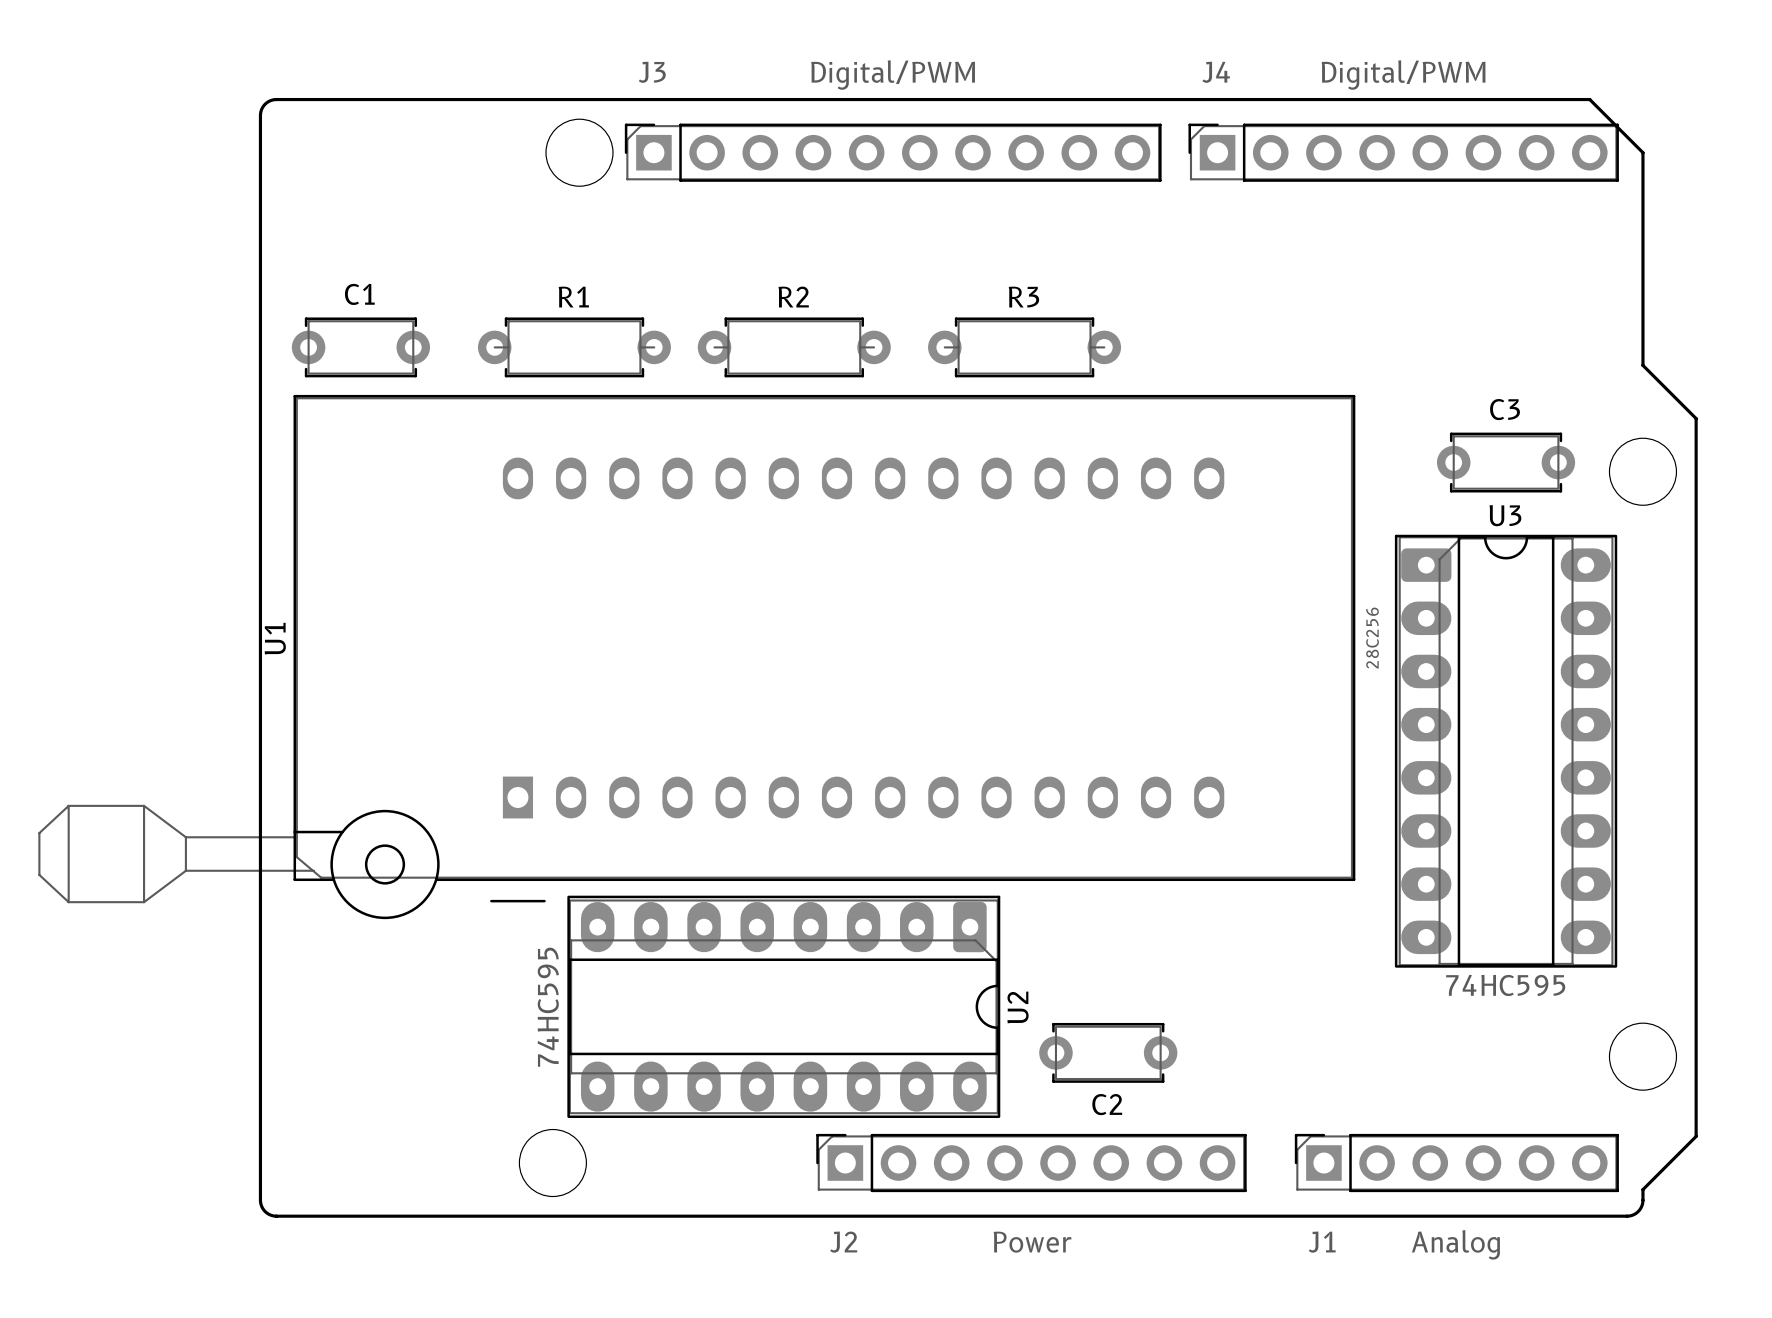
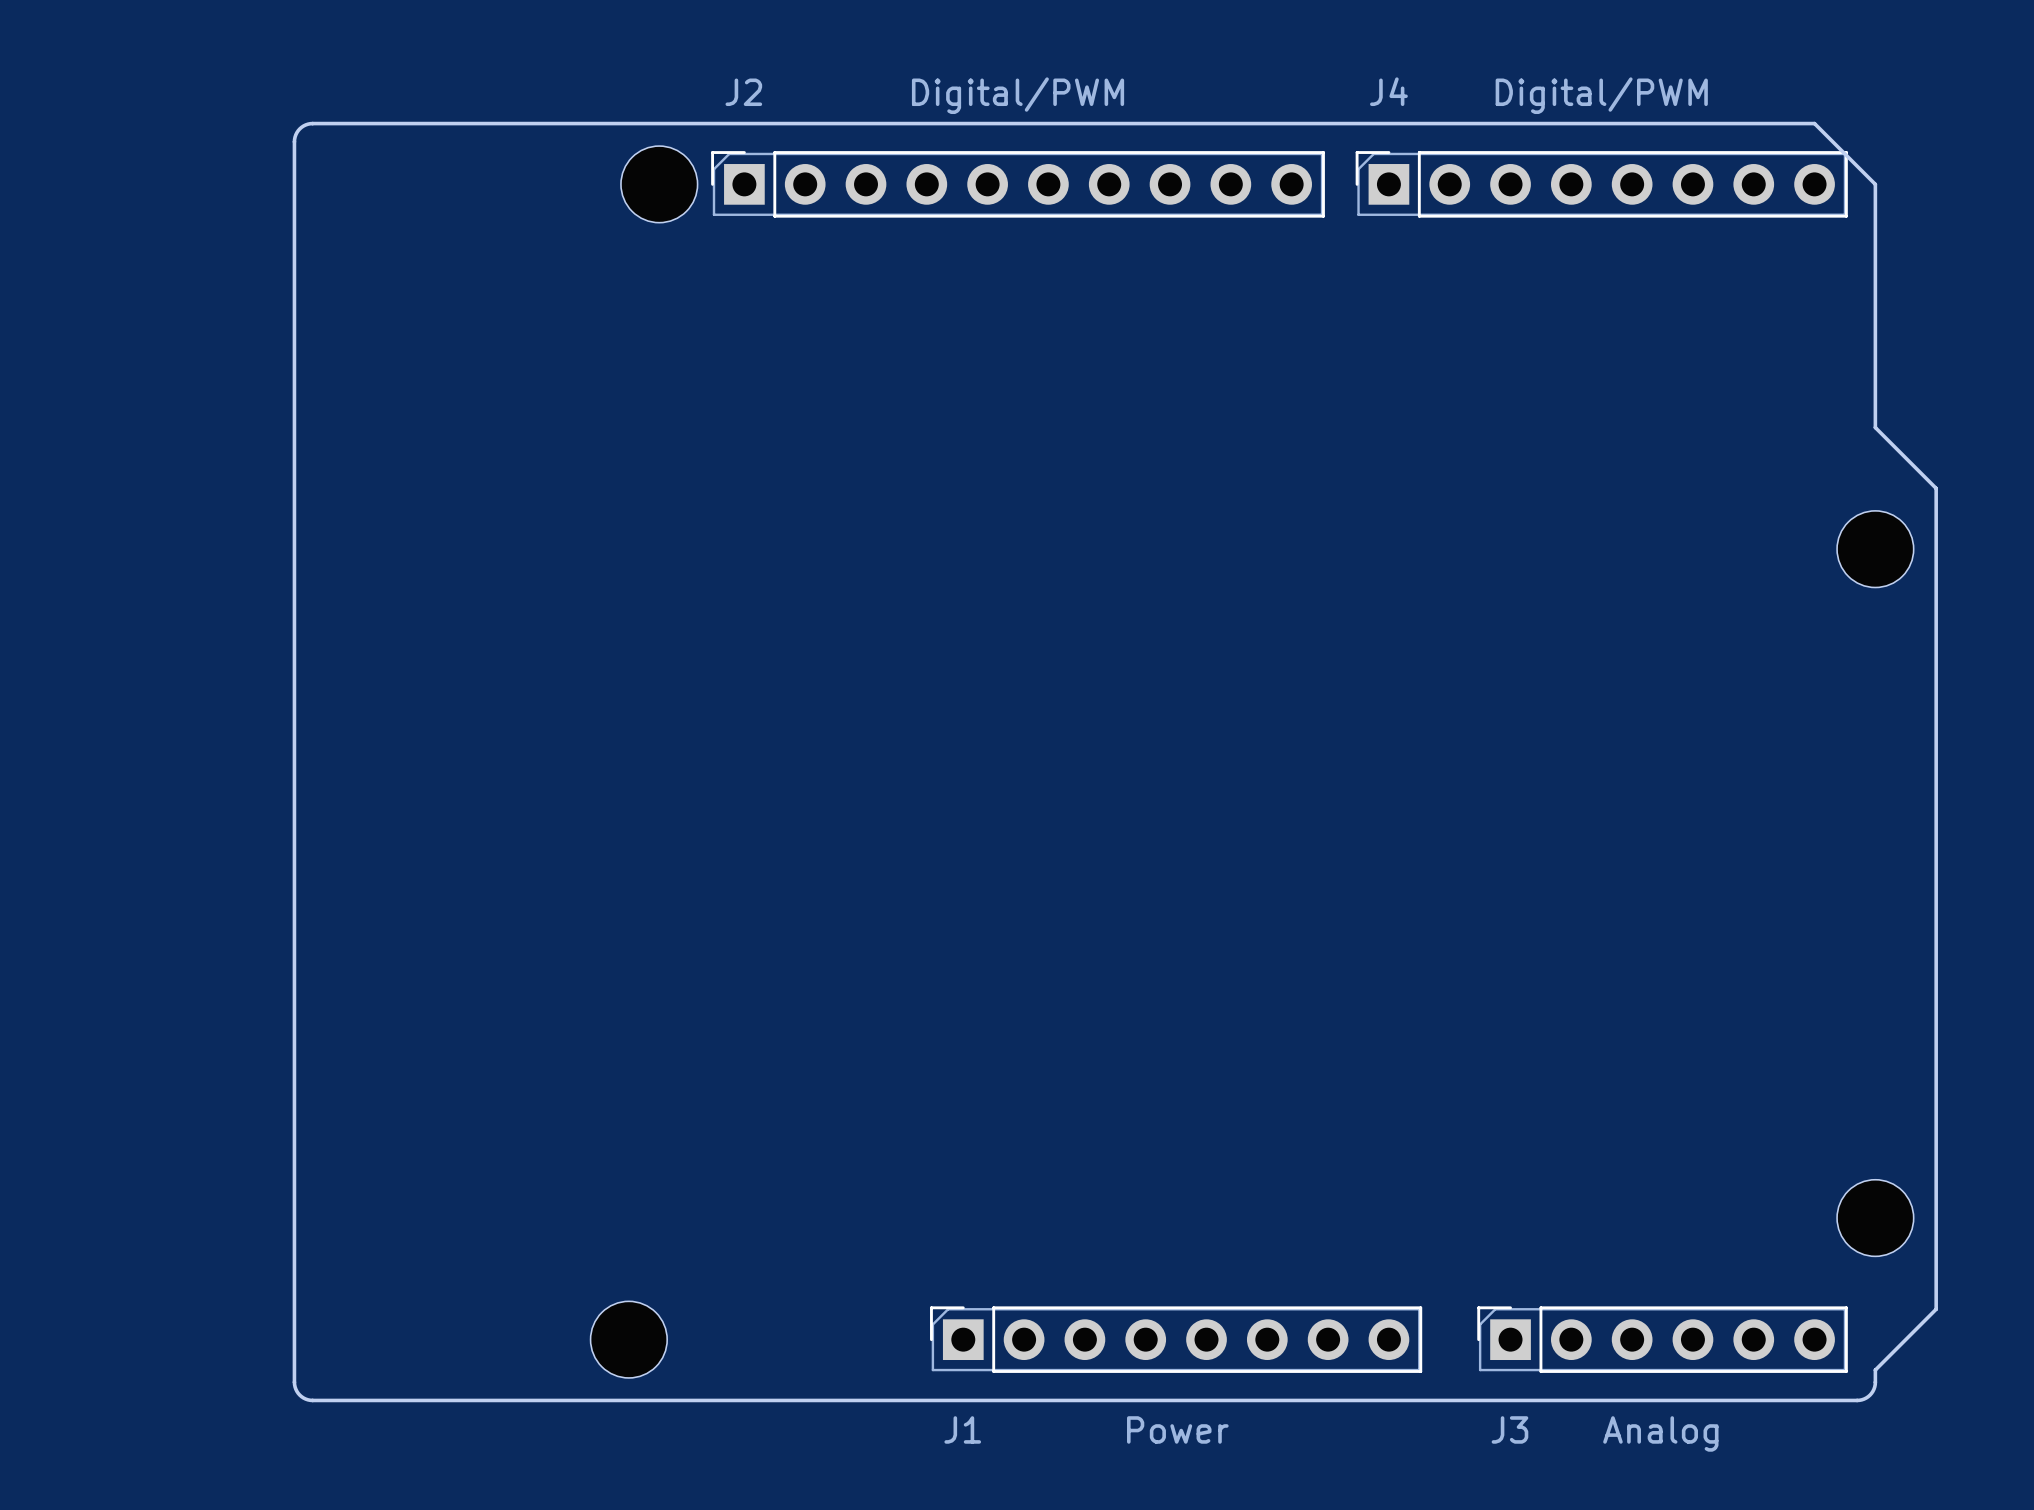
J3 name: J3 (652, 72) -> J2 (743, 92)
C1: (360, 347) -> none
R1: (574, 347) -> none
R2: (794, 347) -> none
R3: (1024, 347) -> none
C3: (1506, 462) -> none
U1: 28C256 (696, 657) -> none
U3: 74HC595 (1506, 751) -> none
U2: 74HC595 (783, 1006) -> none
C2: (1108, 1052) -> none
J2 name: J2 (843, 1242) -> J1 (962, 1429)
J1 name: J1 (1322, 1242) -> J3 (1509, 1429)

